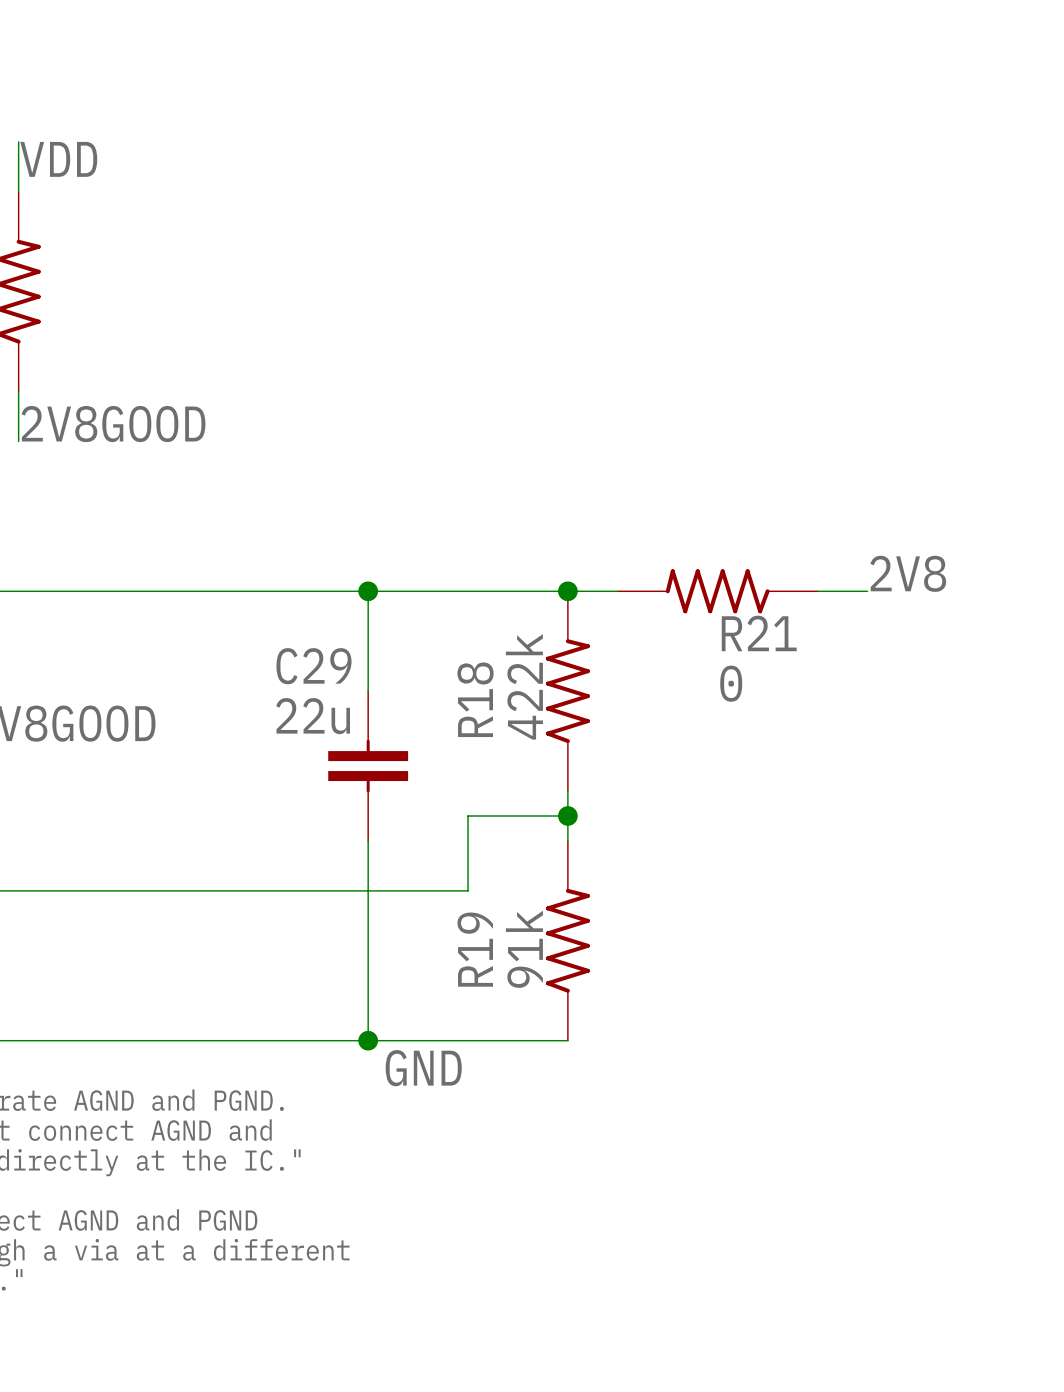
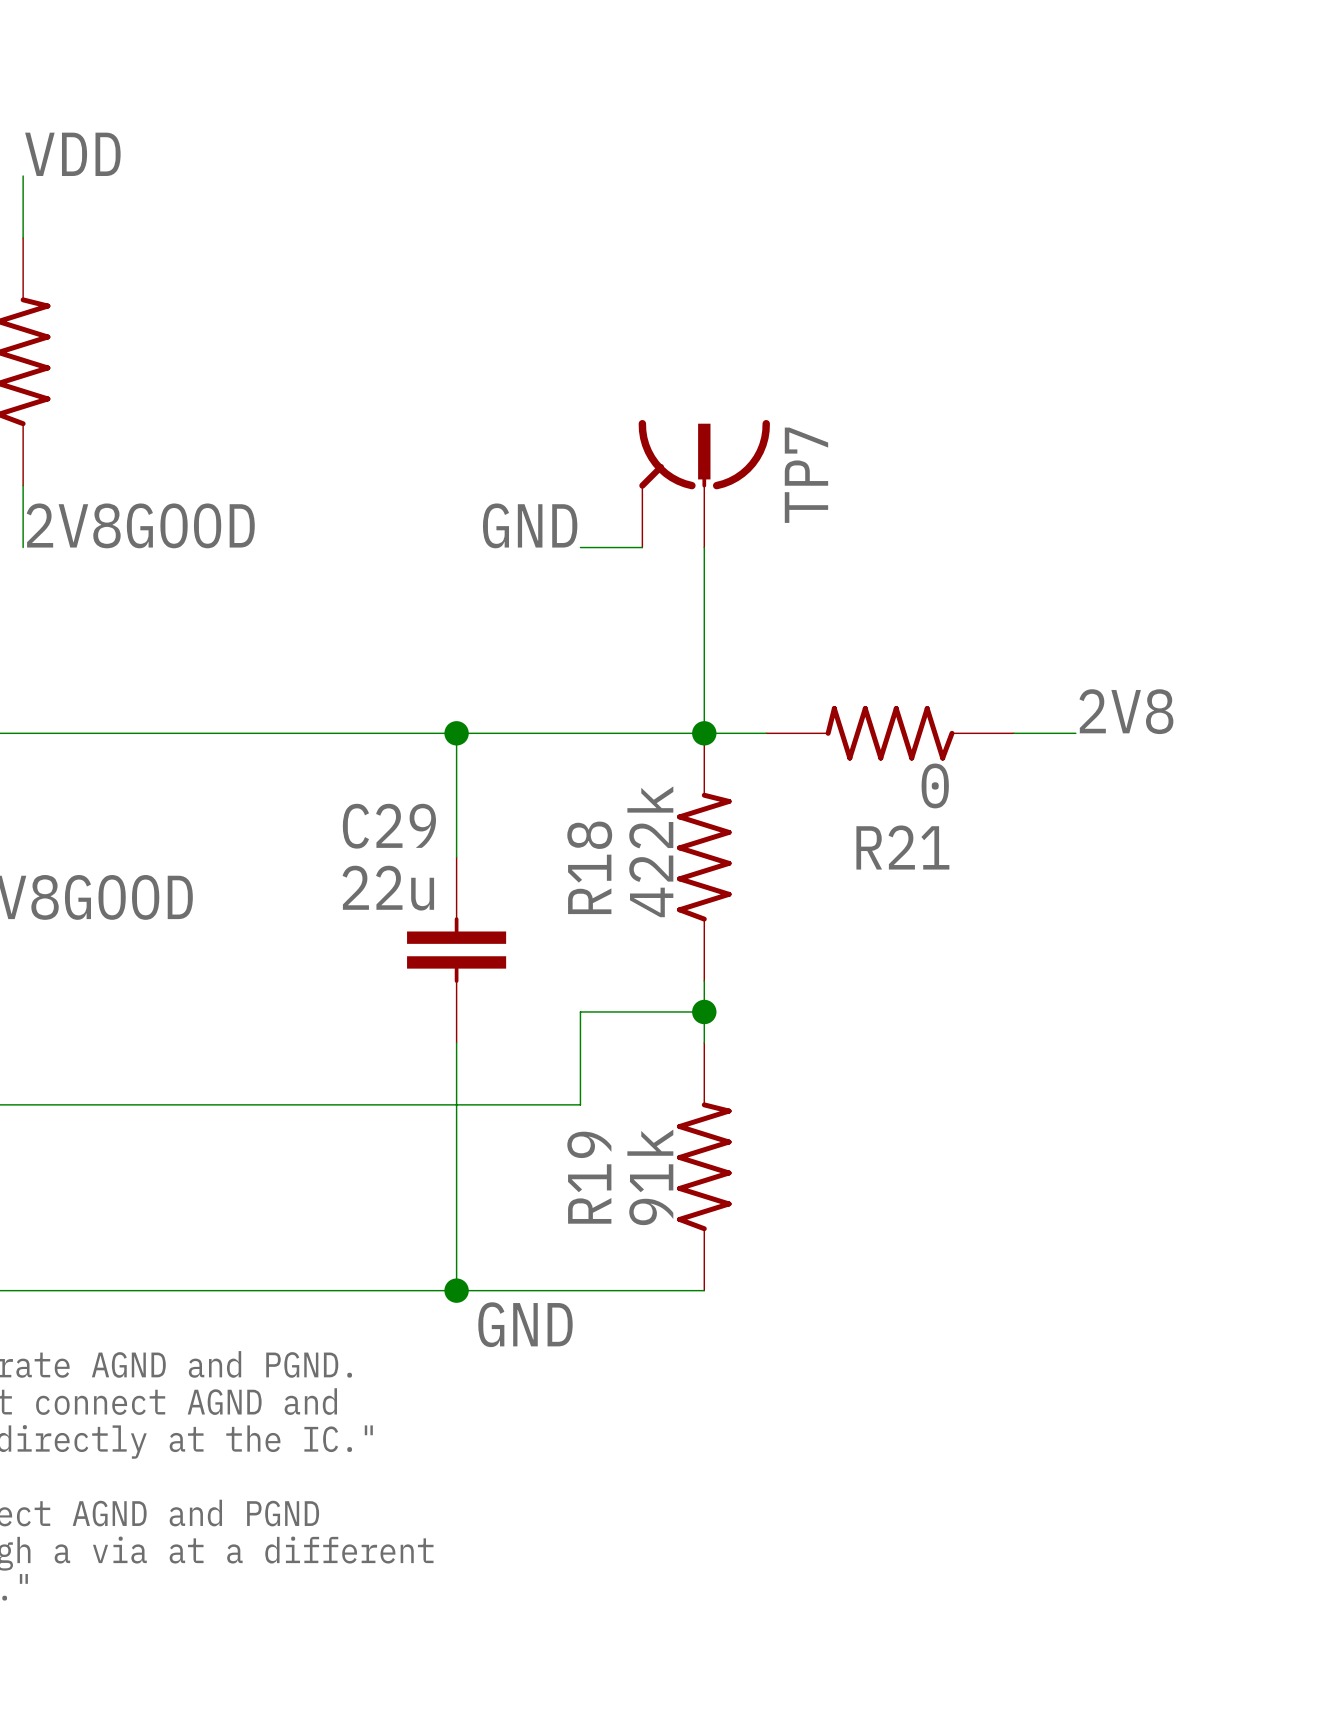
label position: VDD (58, 159) -> VDD (72, 154)
TP7: none -> (704, 483)
label: none -> GND (530, 525)
wire: none -> (580, 547) (642, 547)
wire: none -> (704, 547) (704, 733)
R21 name position: R21 (759, 633) -> R21 (902, 847)
R21 value position: 0 (731, 683) -> 0 (935, 785)

